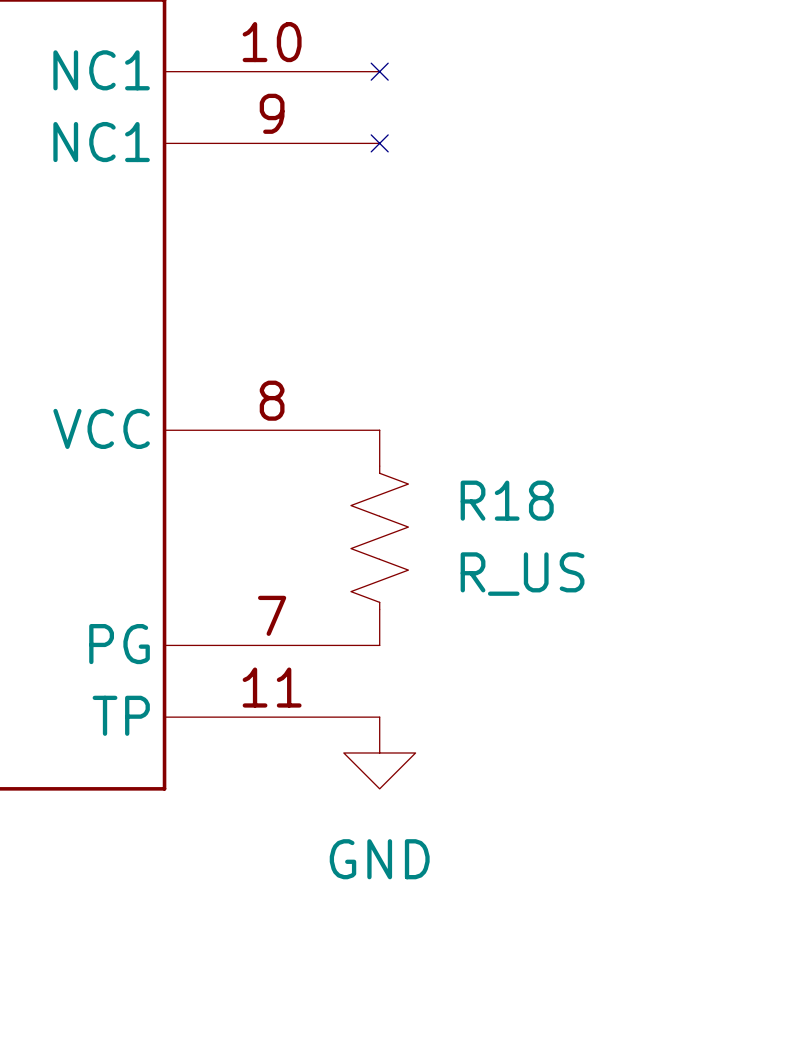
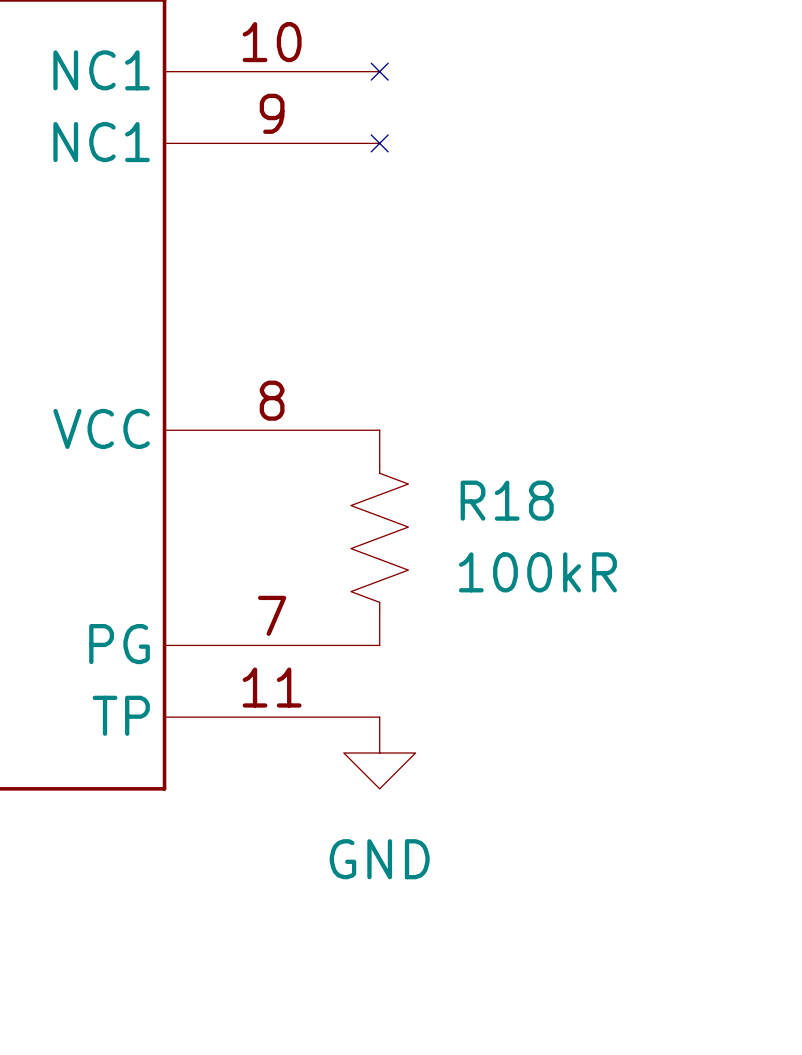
R18 value: R_US (522, 574) -> 100kR (537, 572)

